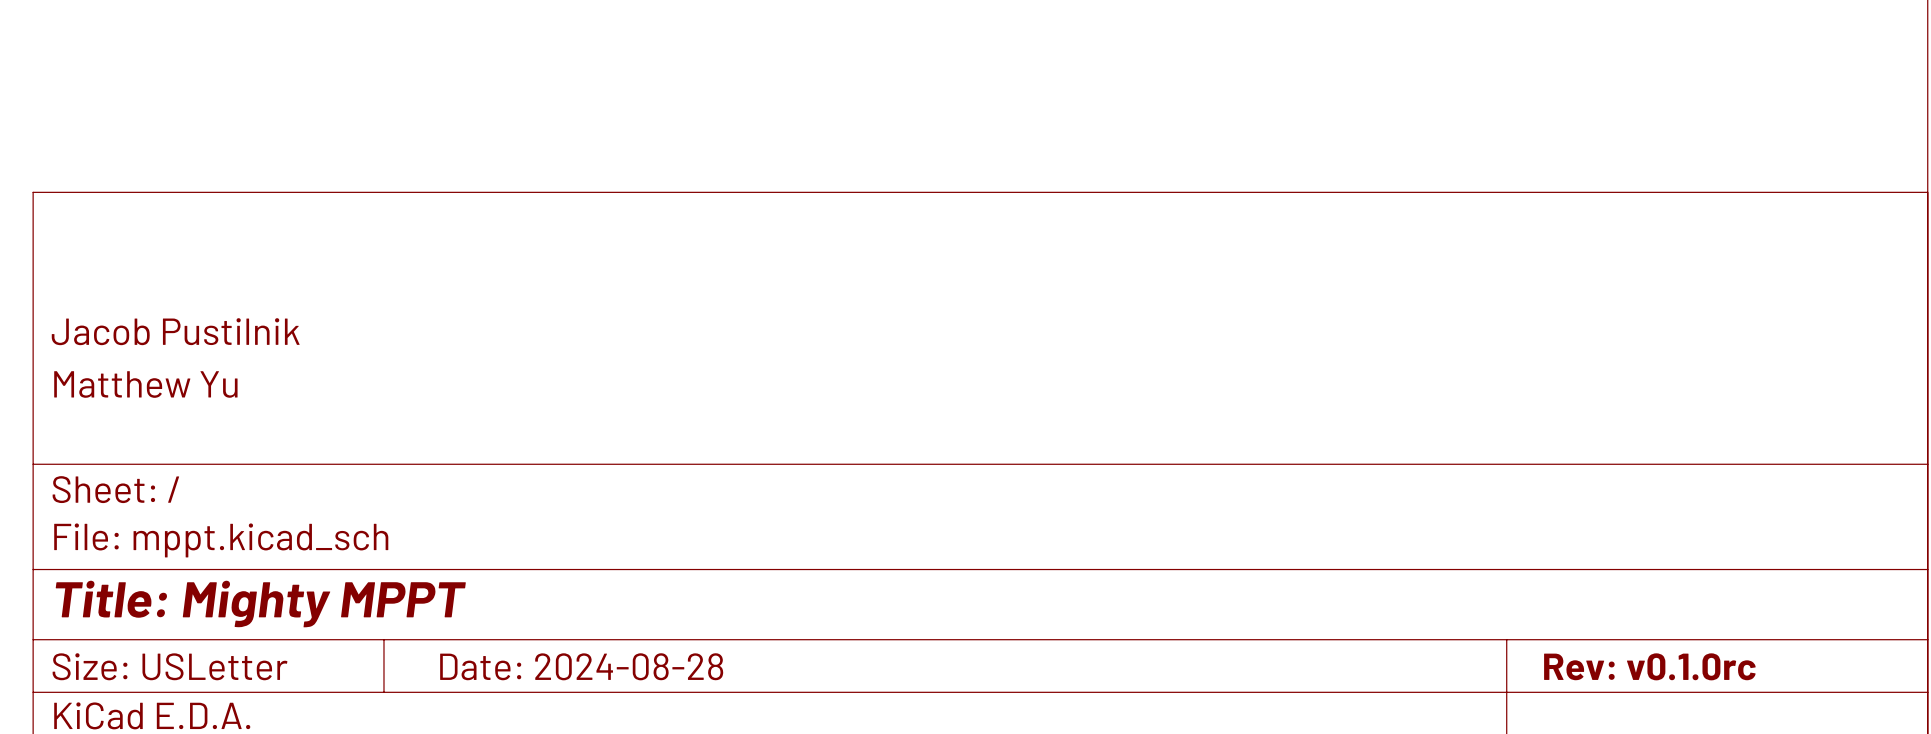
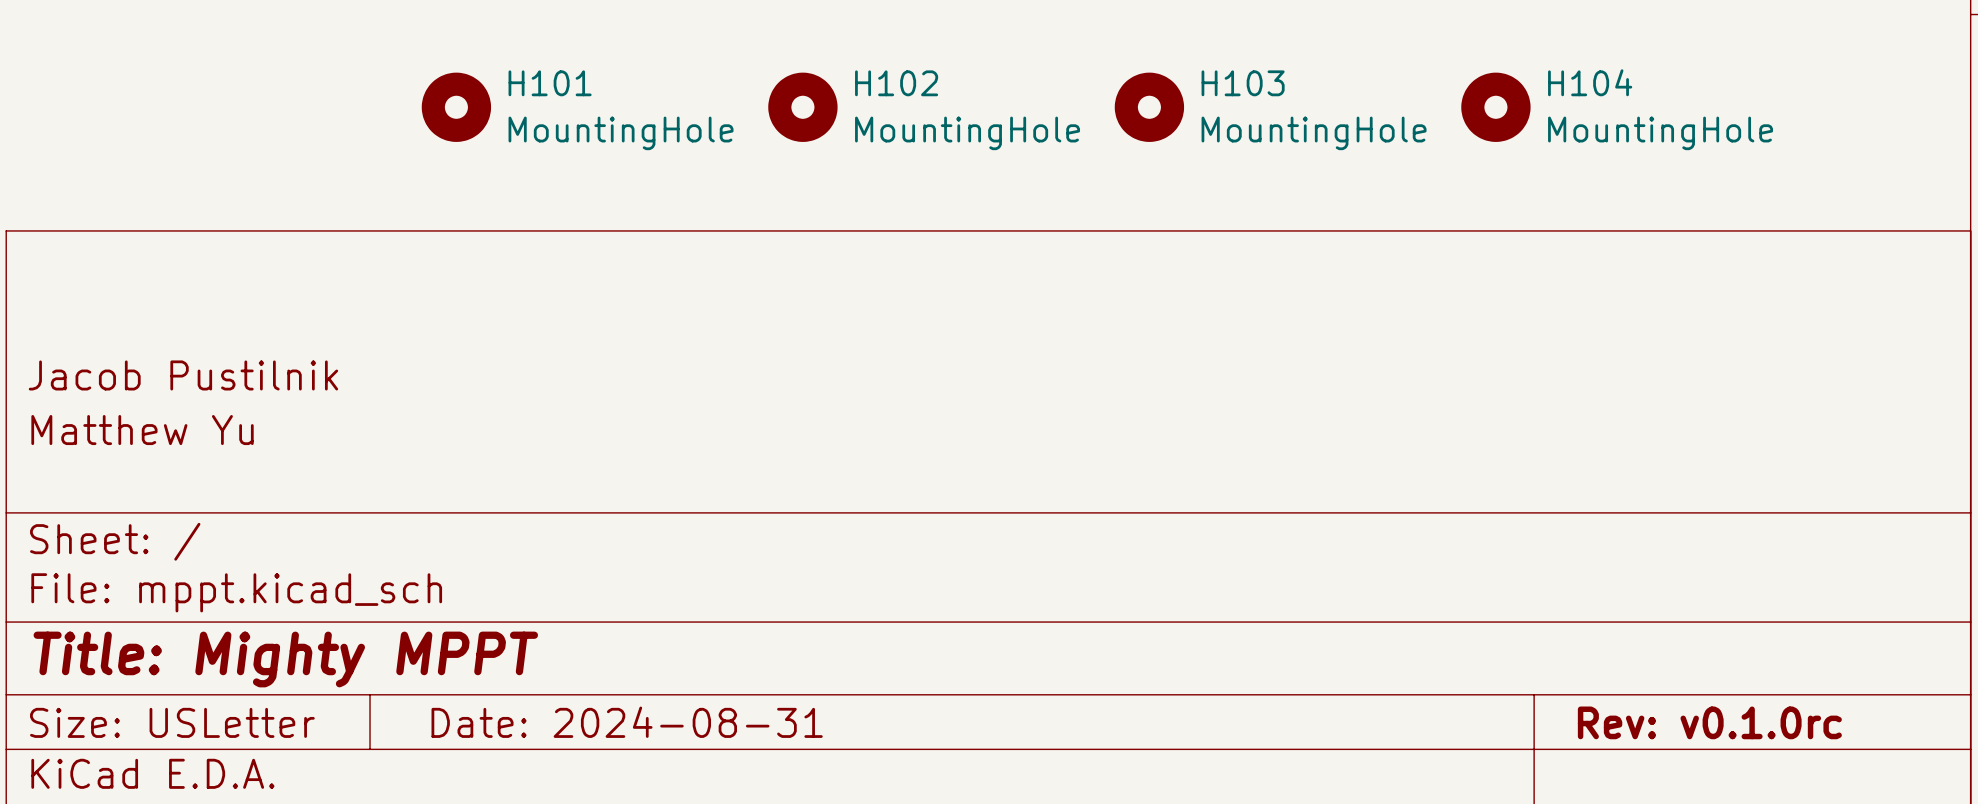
H101: none -> MountingHole (456, 107)
H102: none -> MountingHole (802, 107)
H103: none -> MountingHole (1149, 107)
H104: none -> MountingHole (1495, 107)
title block: Date: 2024-08-28 (581, 666) -> Date: 2024-08-31 (627, 722)

